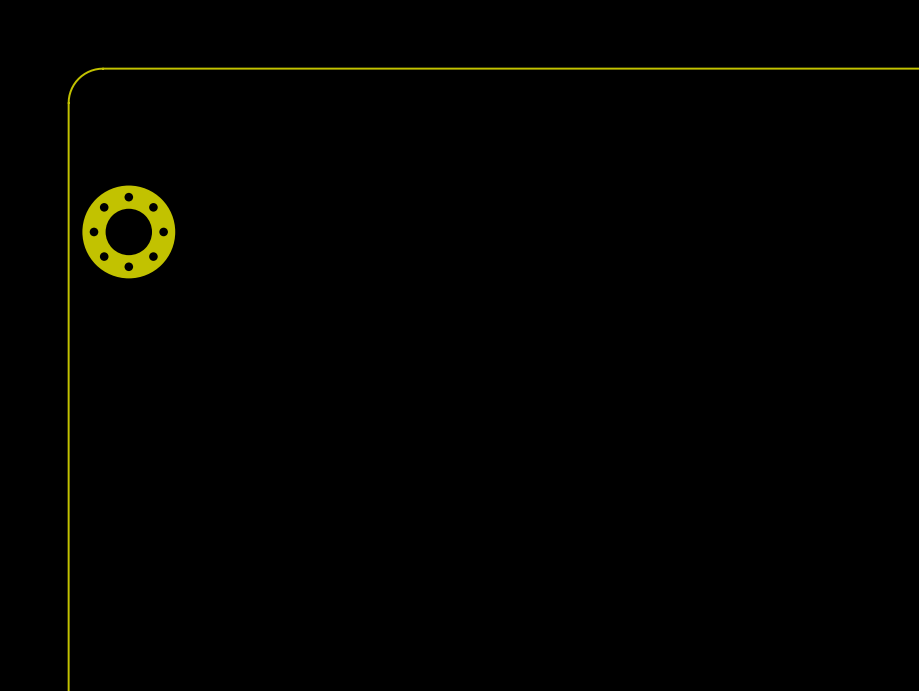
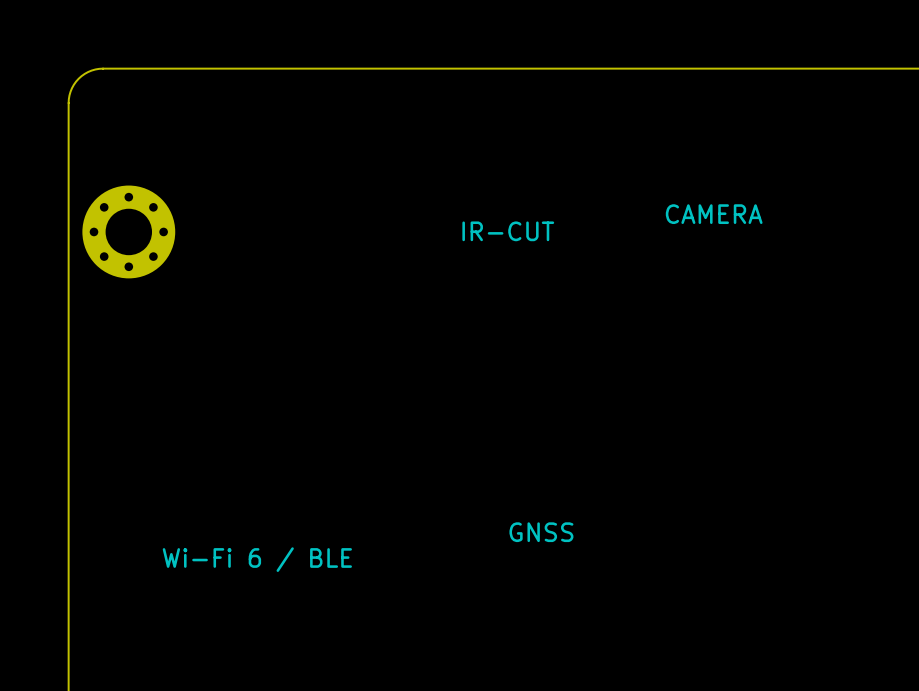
text: none -> CAMERA (714, 214)
text: none -> IR-CUT (508, 231)
text: none -> GNSS (541, 532)
text: none -> Wi-Fi 6 / BLE (257, 559)

